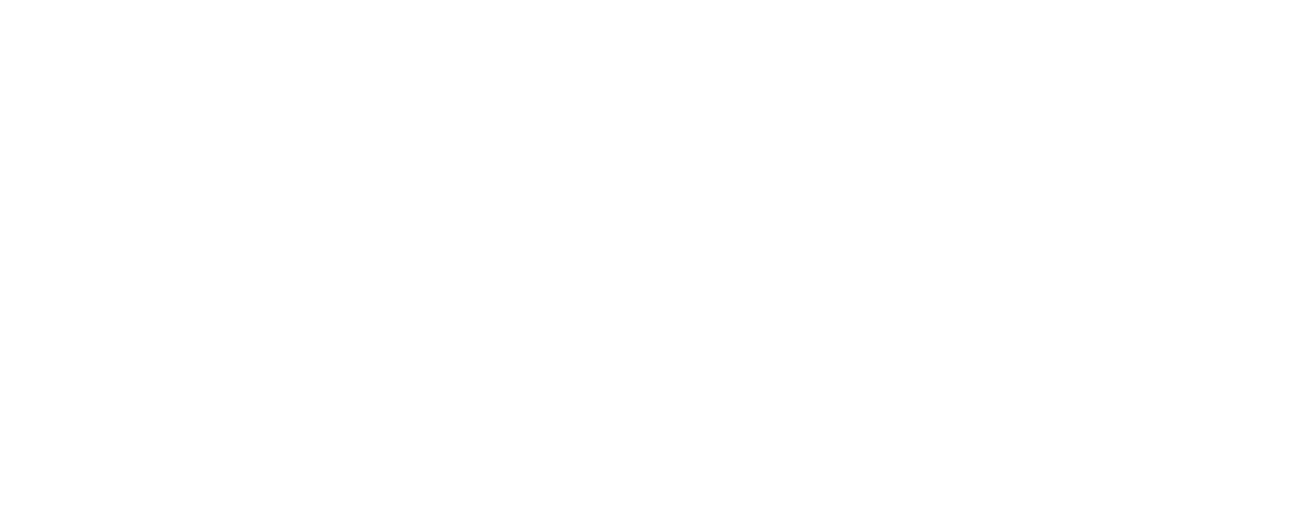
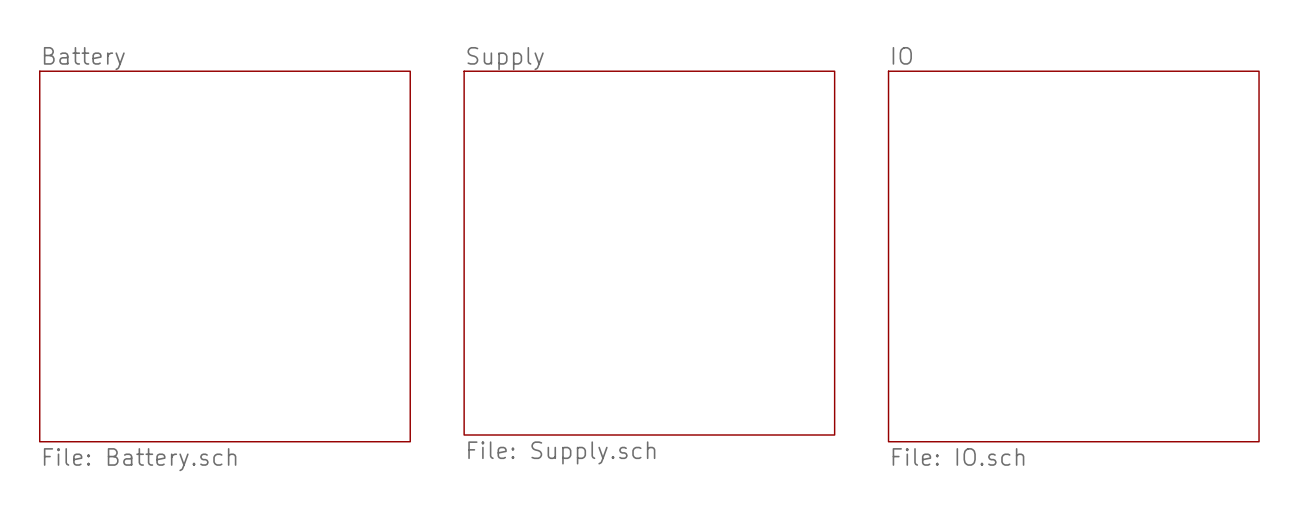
sheet Supply: none -> File: Supply.sch (649, 253)
sheet Battery: none -> File: Battery.sch (224, 256)
sheet IO: none -> File: IO.sch (1073, 256)

